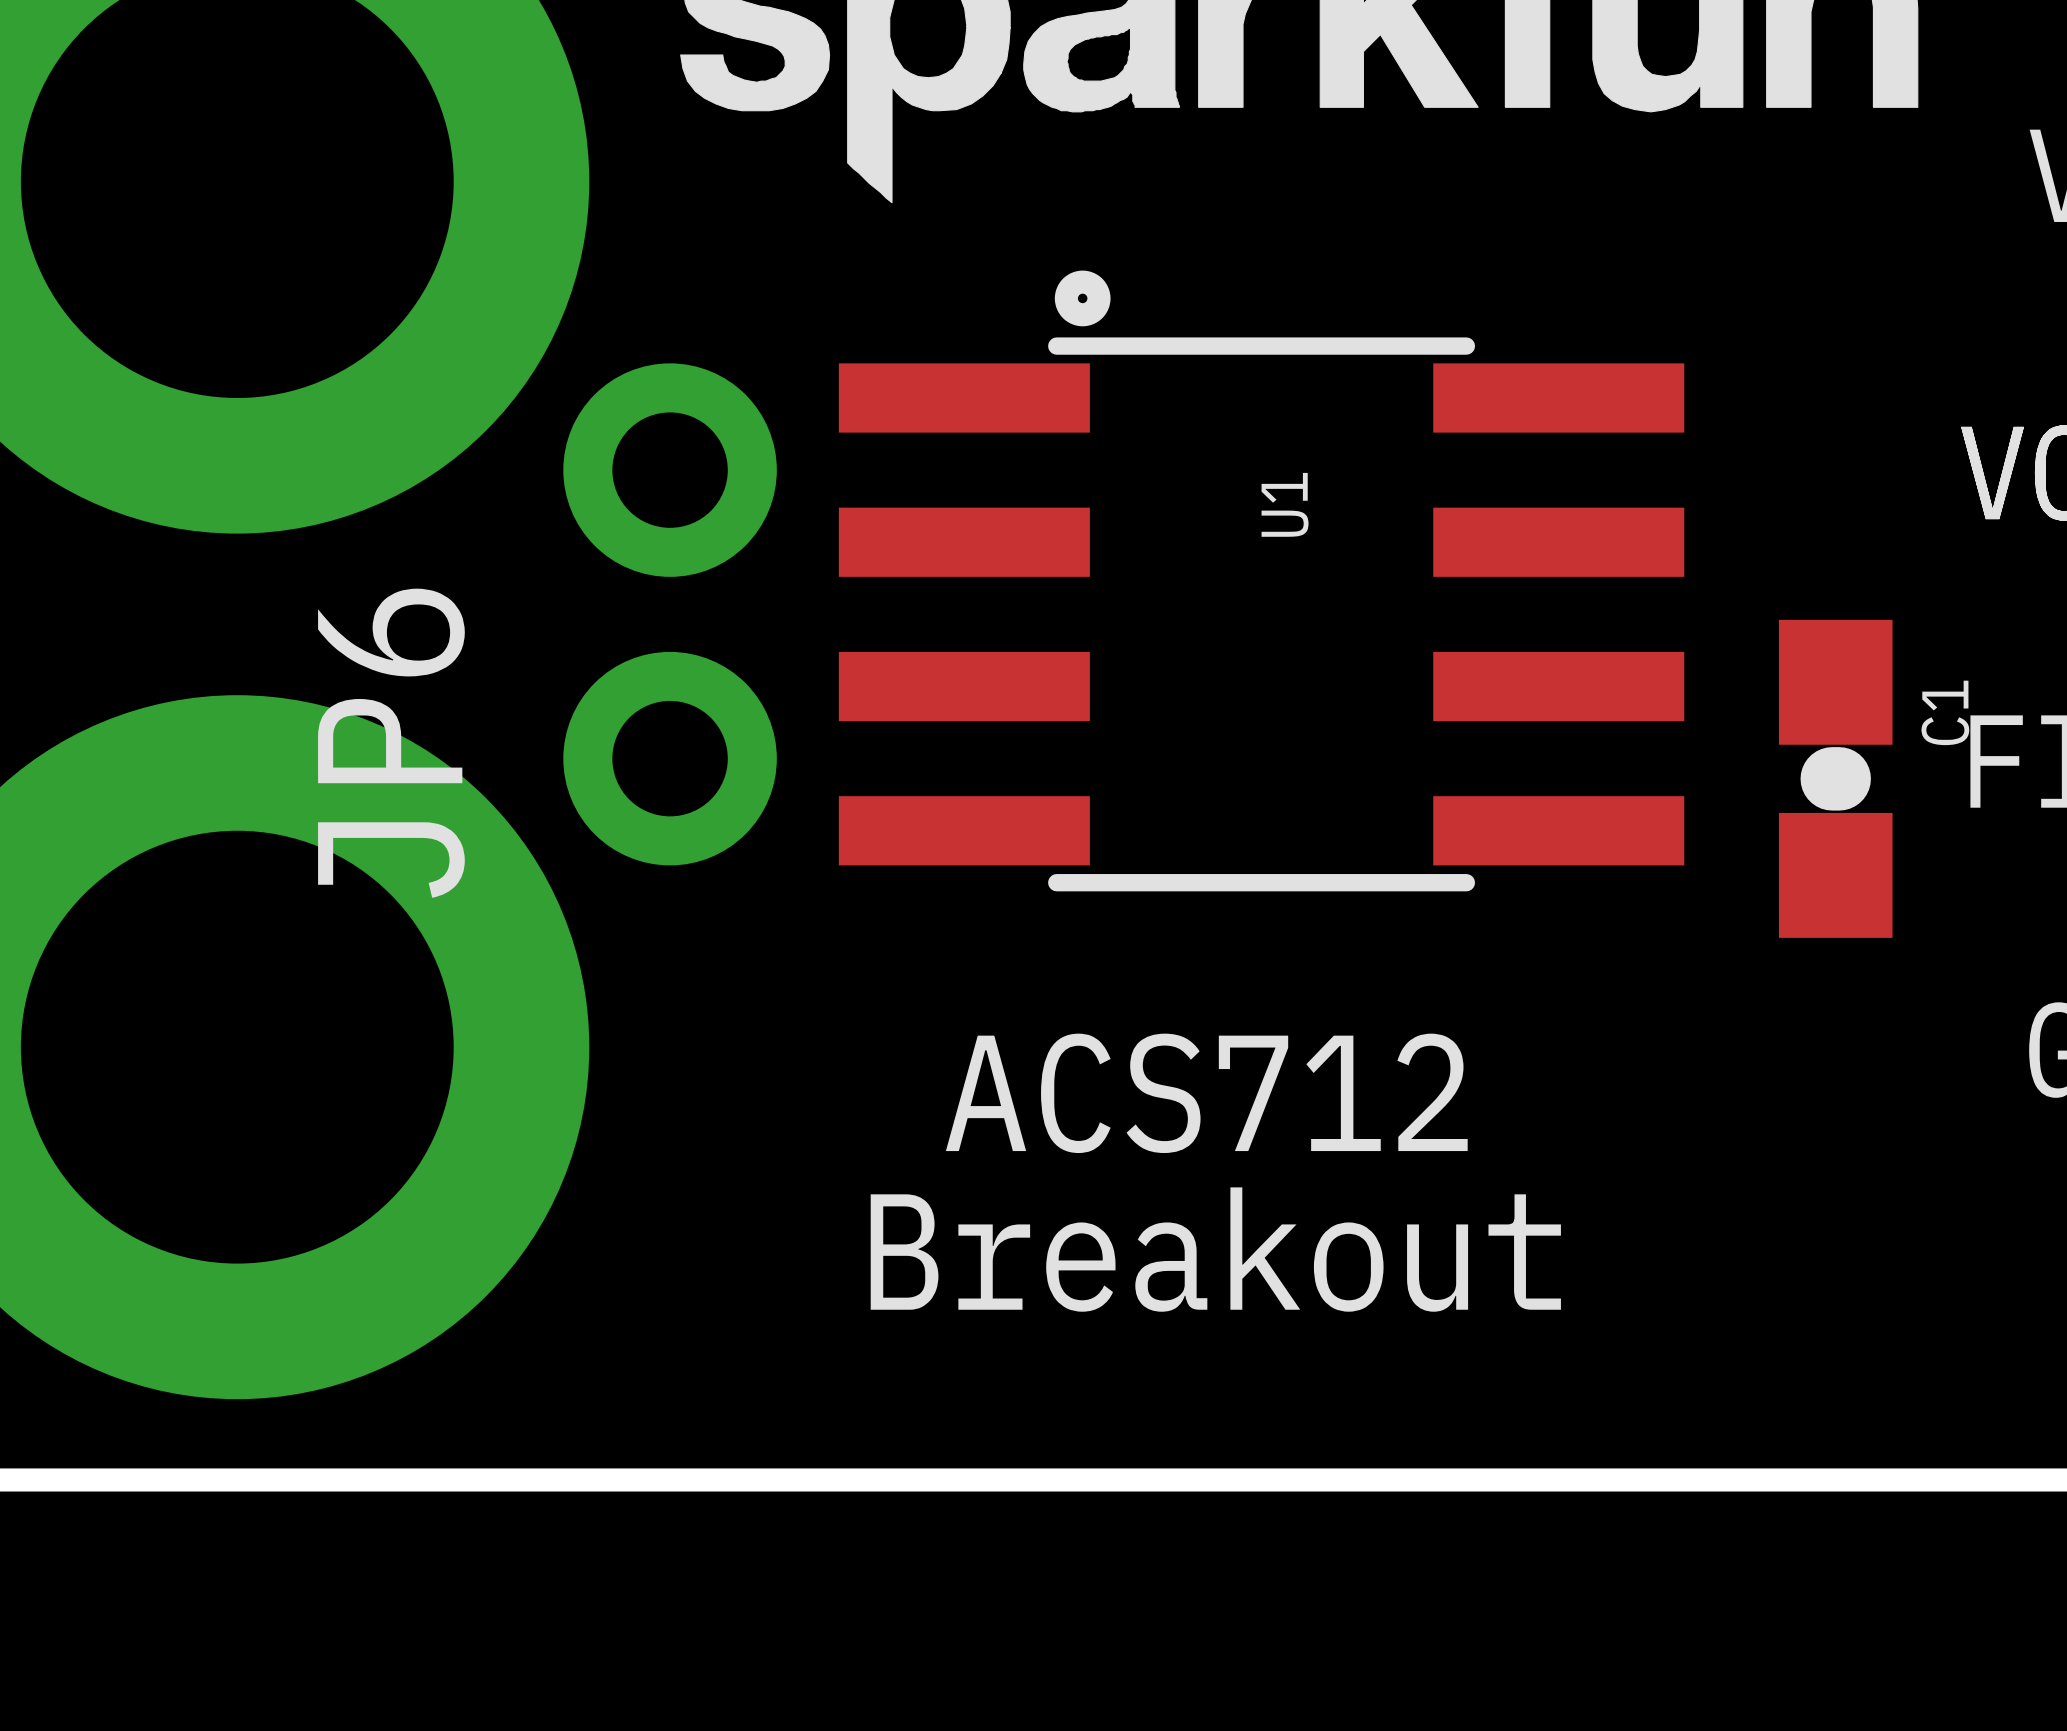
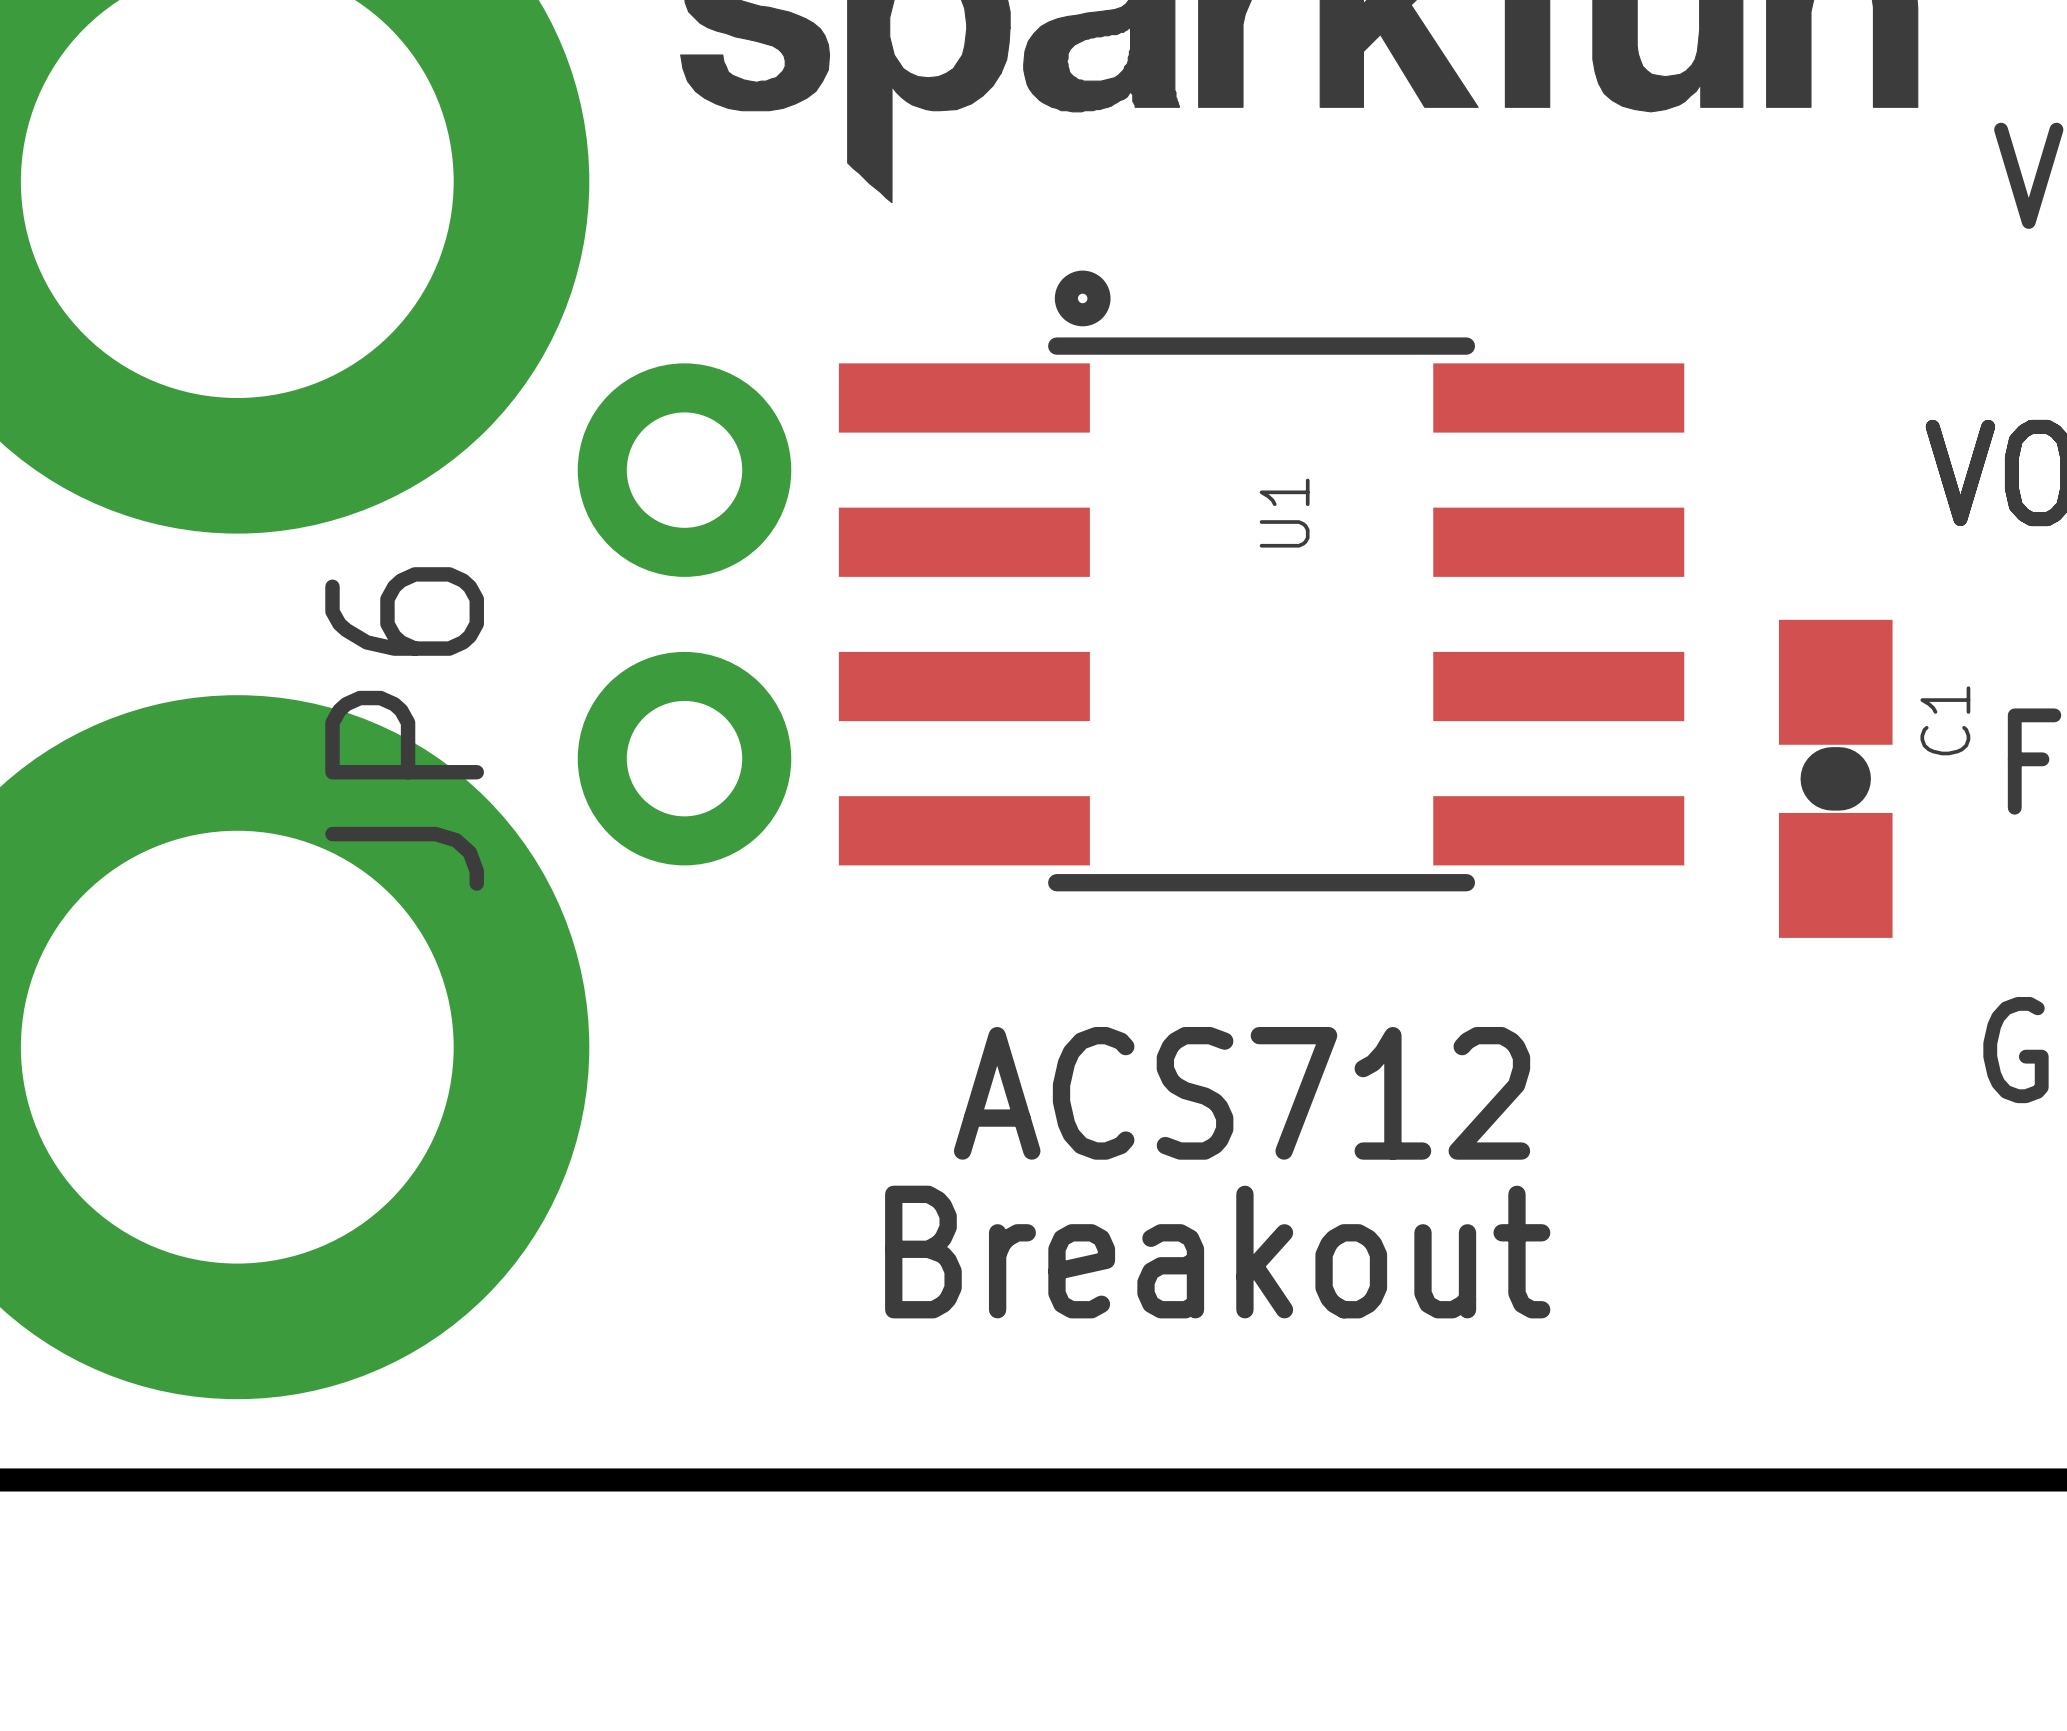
JP6 position: (670, 614) -> (684, 614)

